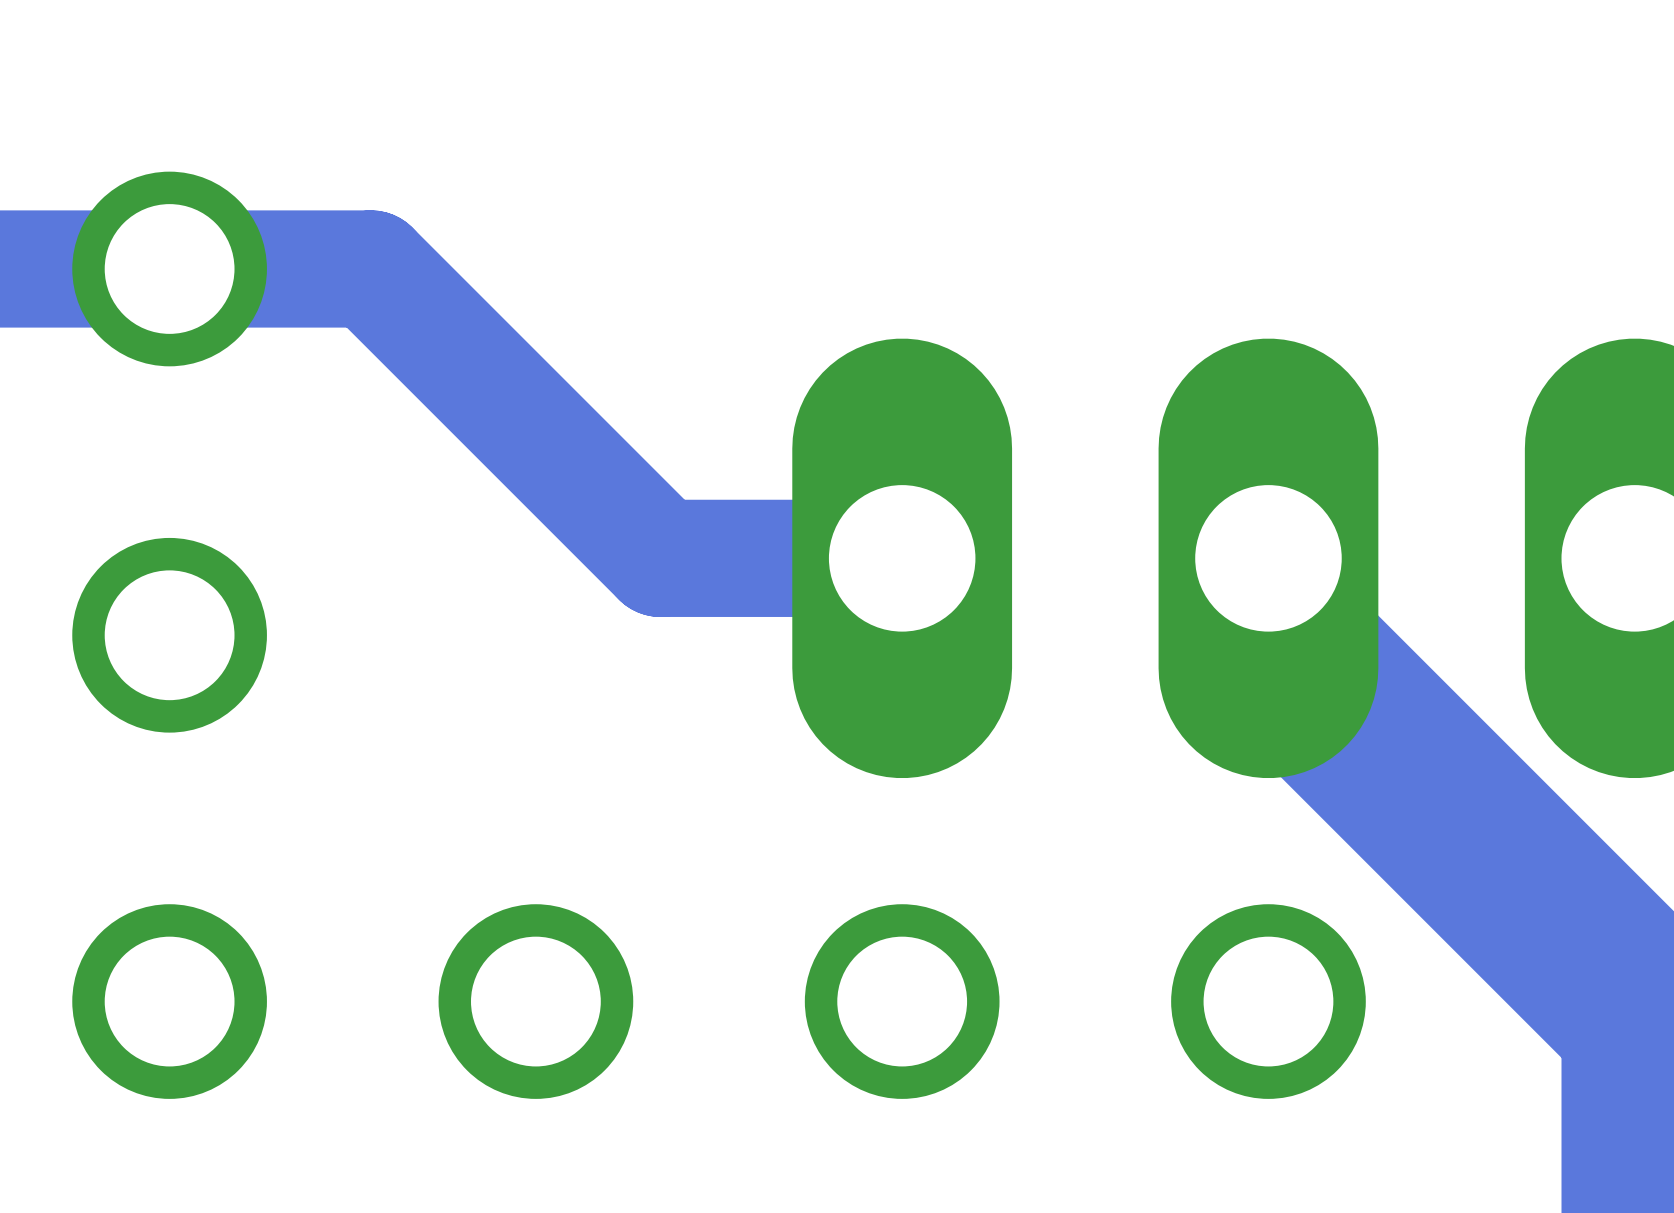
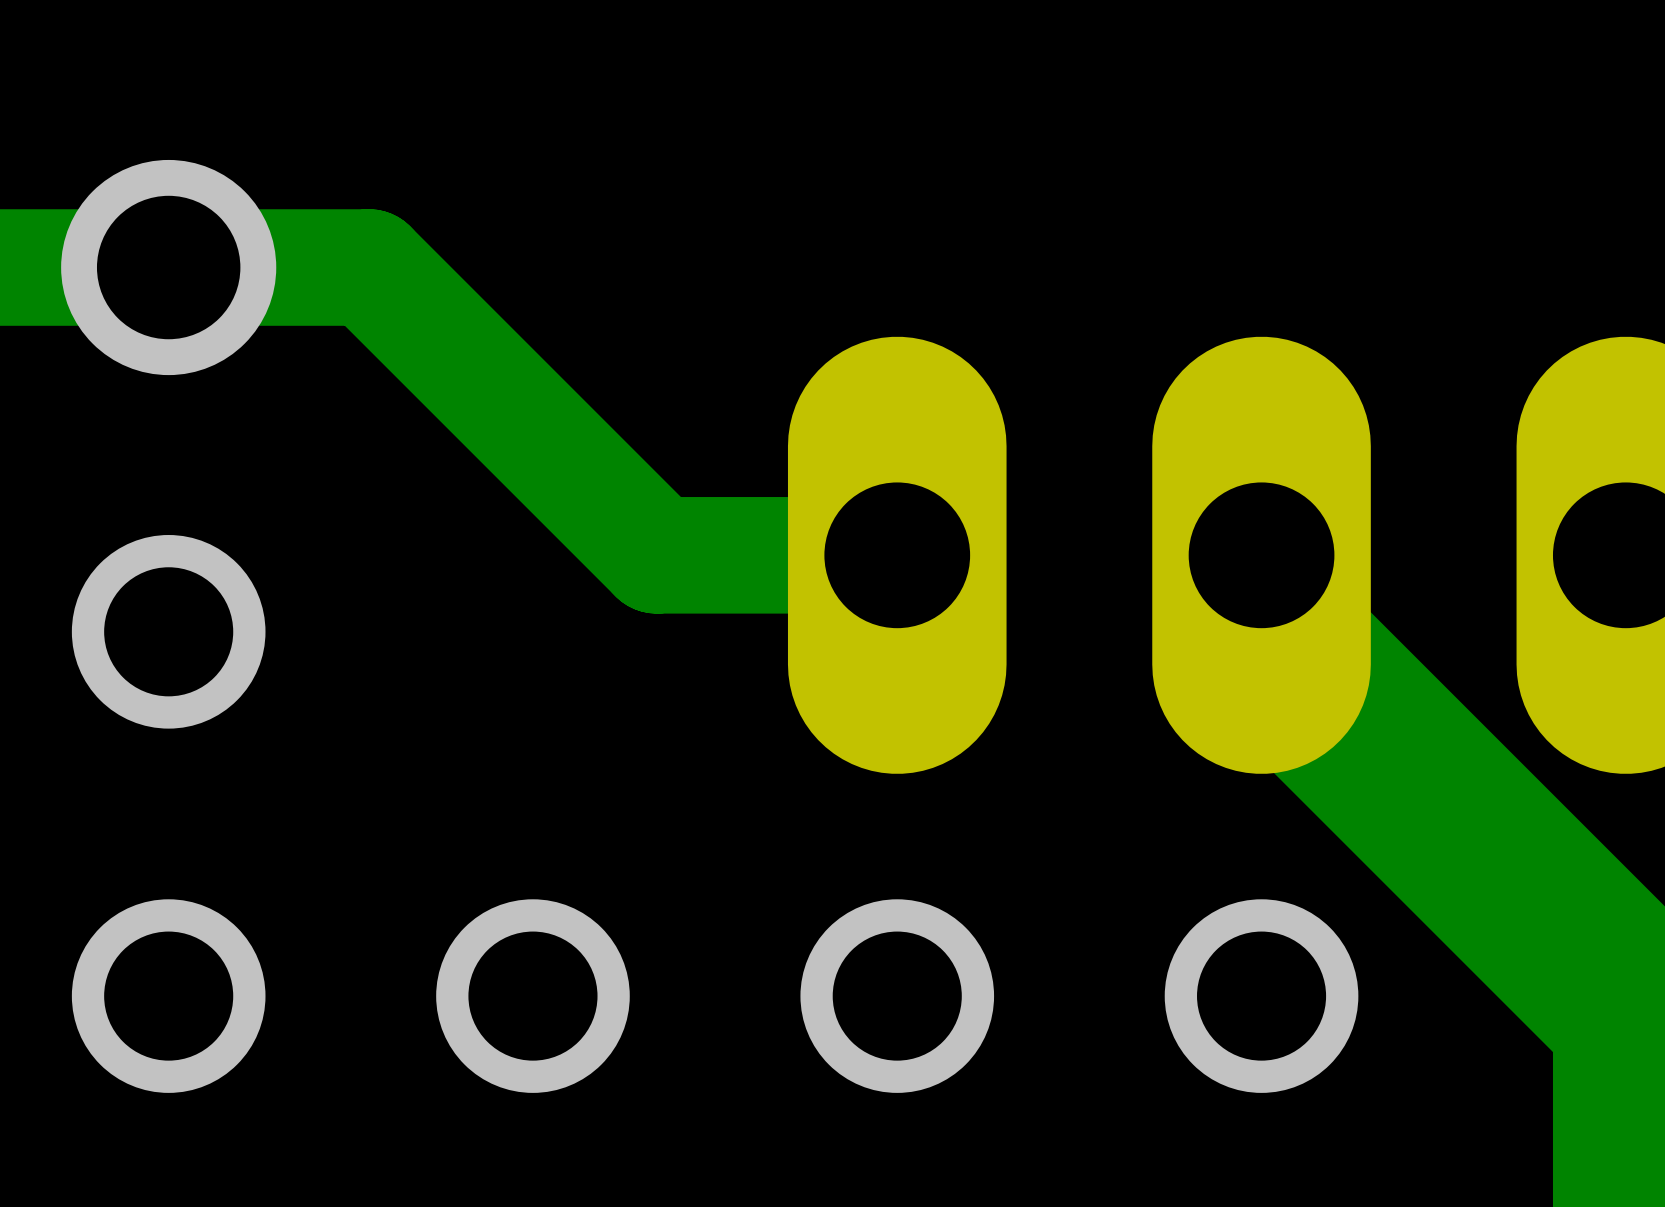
via size: [72, 171, 267, 367] -> [61, 159, 277, 376]

